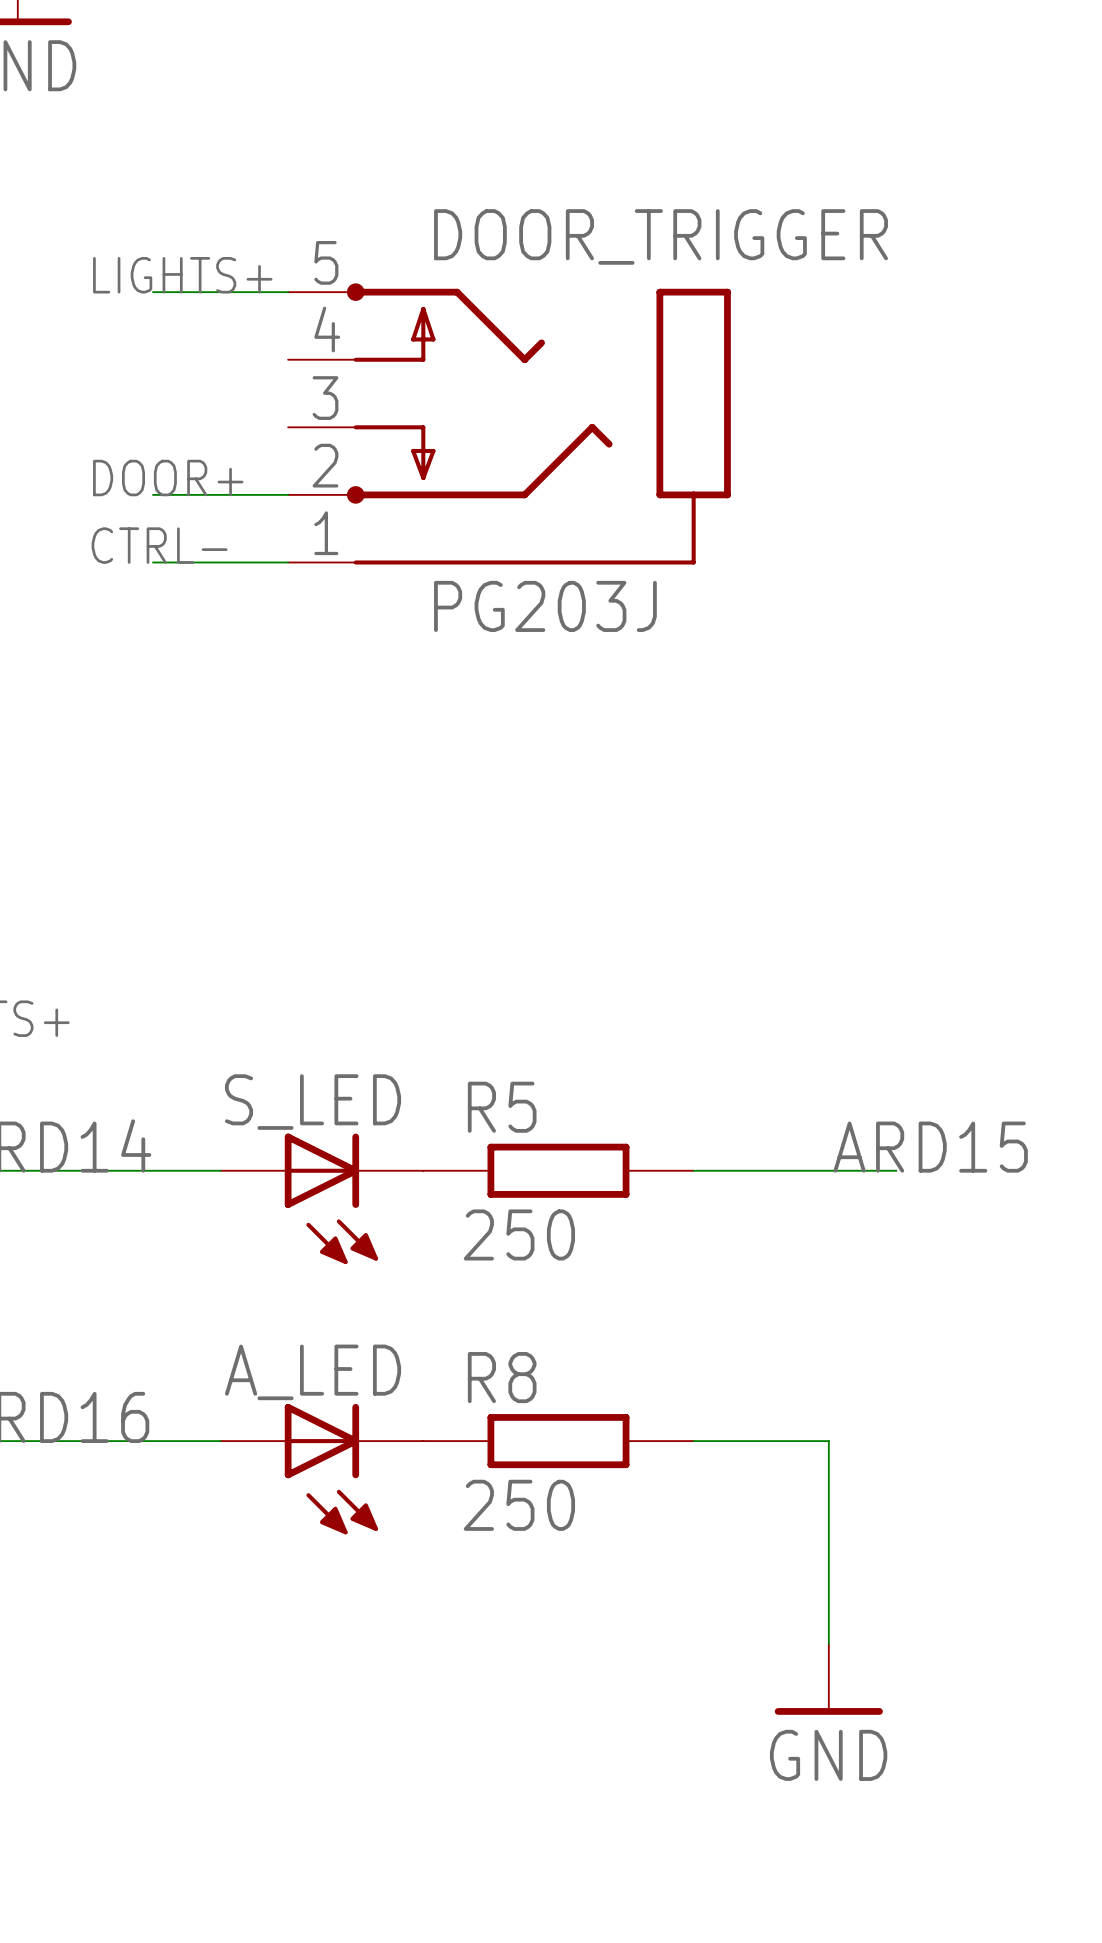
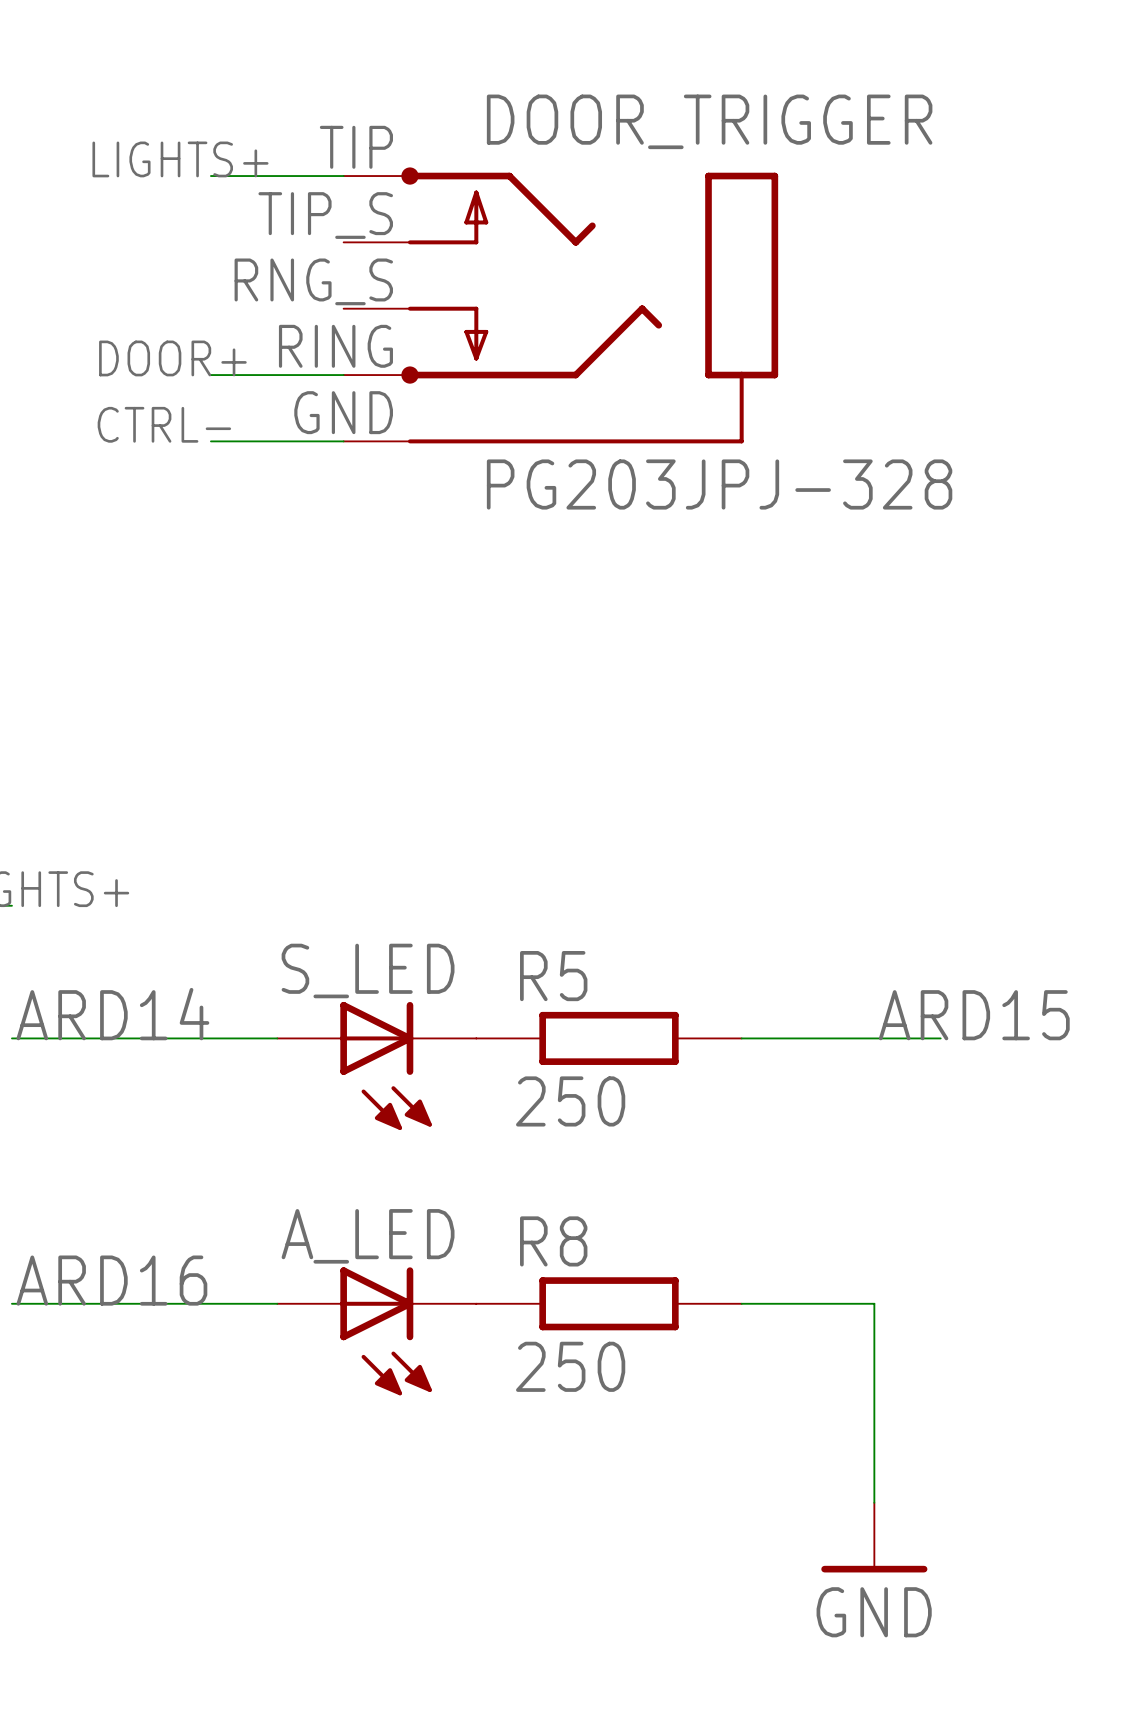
DOOR_TRIGGER pin number: 5 (326, 262) -> TIP (356, 147)
label position: LIGHTS+ (182, 275) -> LIGHTS+ (180, 159)
DOOR_TRIGGER pin number: 4 (327, 329) -> TIP_S (325, 215)
DOOR_TRIGGER pin number: 3 (325, 398) -> RNG_S (313, 281)
DOOR_TRIGGER pin number: 2 (325, 465) -> RING (335, 346)
label position: DOOR+ (168, 478) -> DOOR+ (172, 358)
DOOR_TRIGGER pin number: 1 (326, 533) -> GND (343, 412)
label position: CTRL- (159, 545) -> CTRL- (164, 424)
DOOR_TRIGGER value: PG203J (545, 606) -> PG203JPJ-328 (719, 484)

